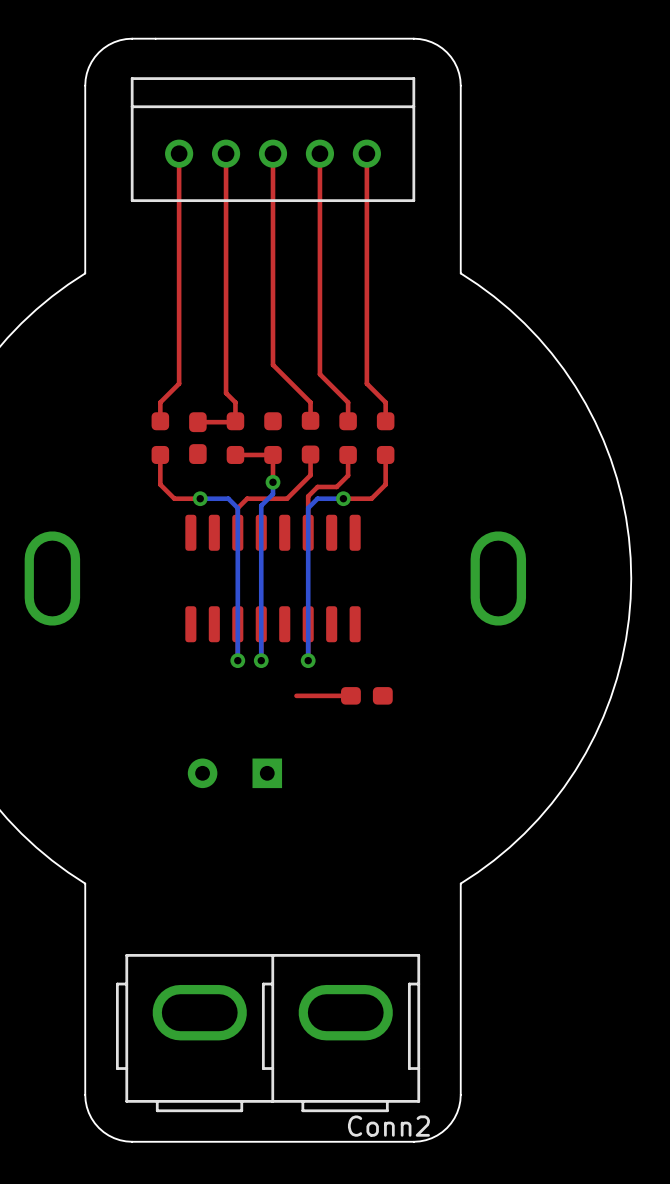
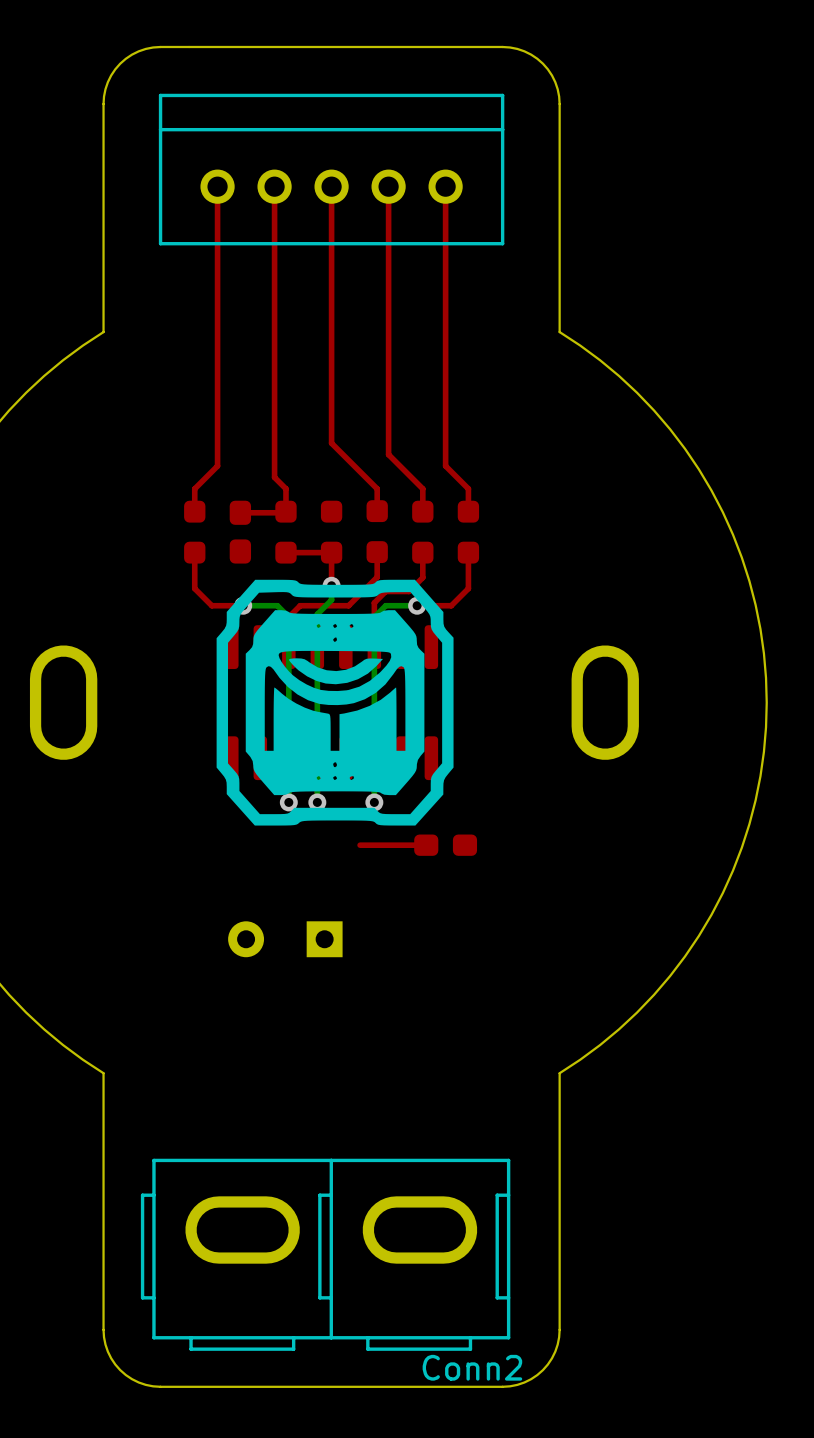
drawing: none -> [216, 579, 454, 826]

